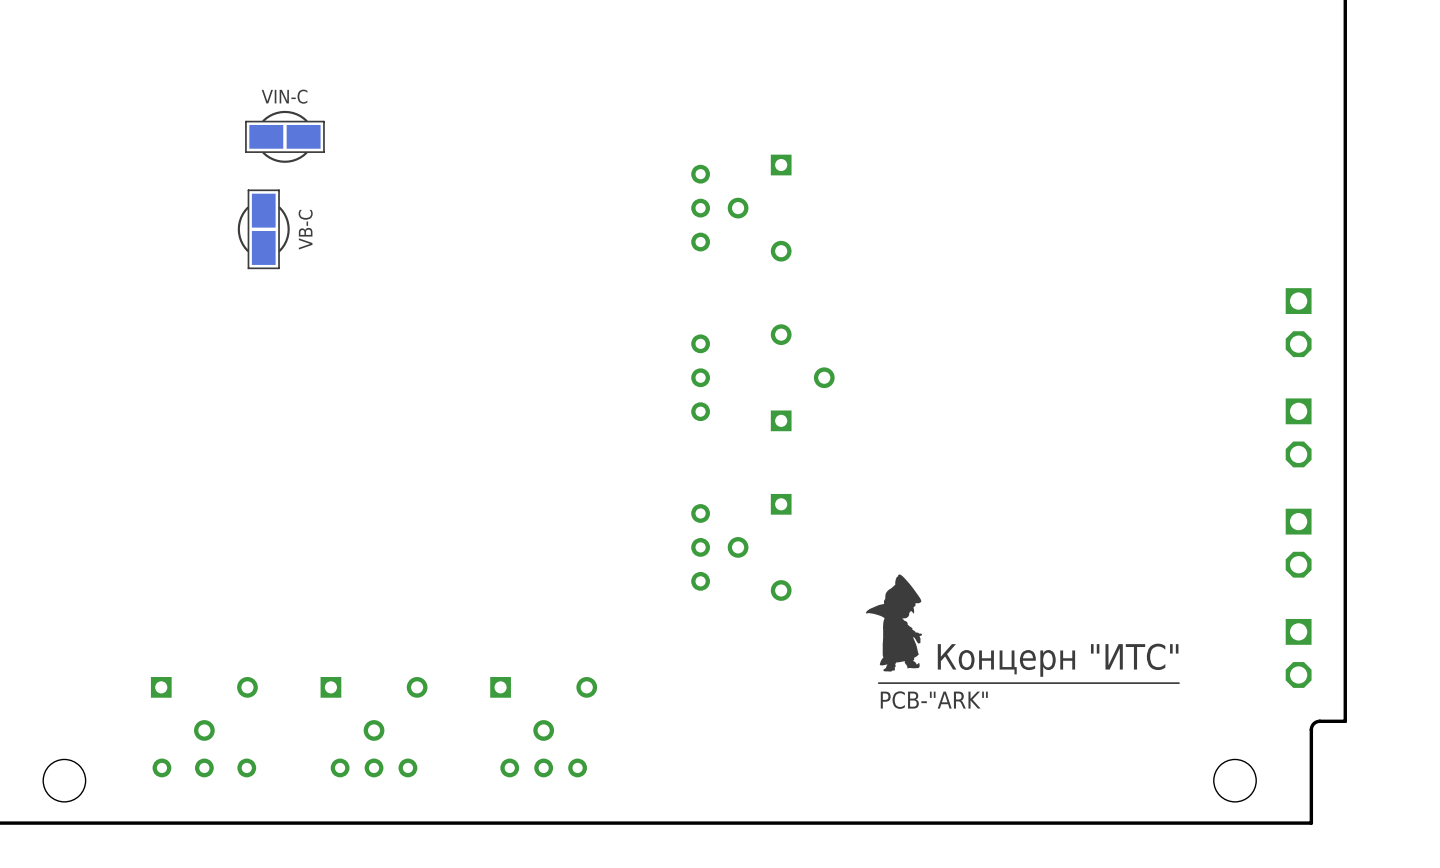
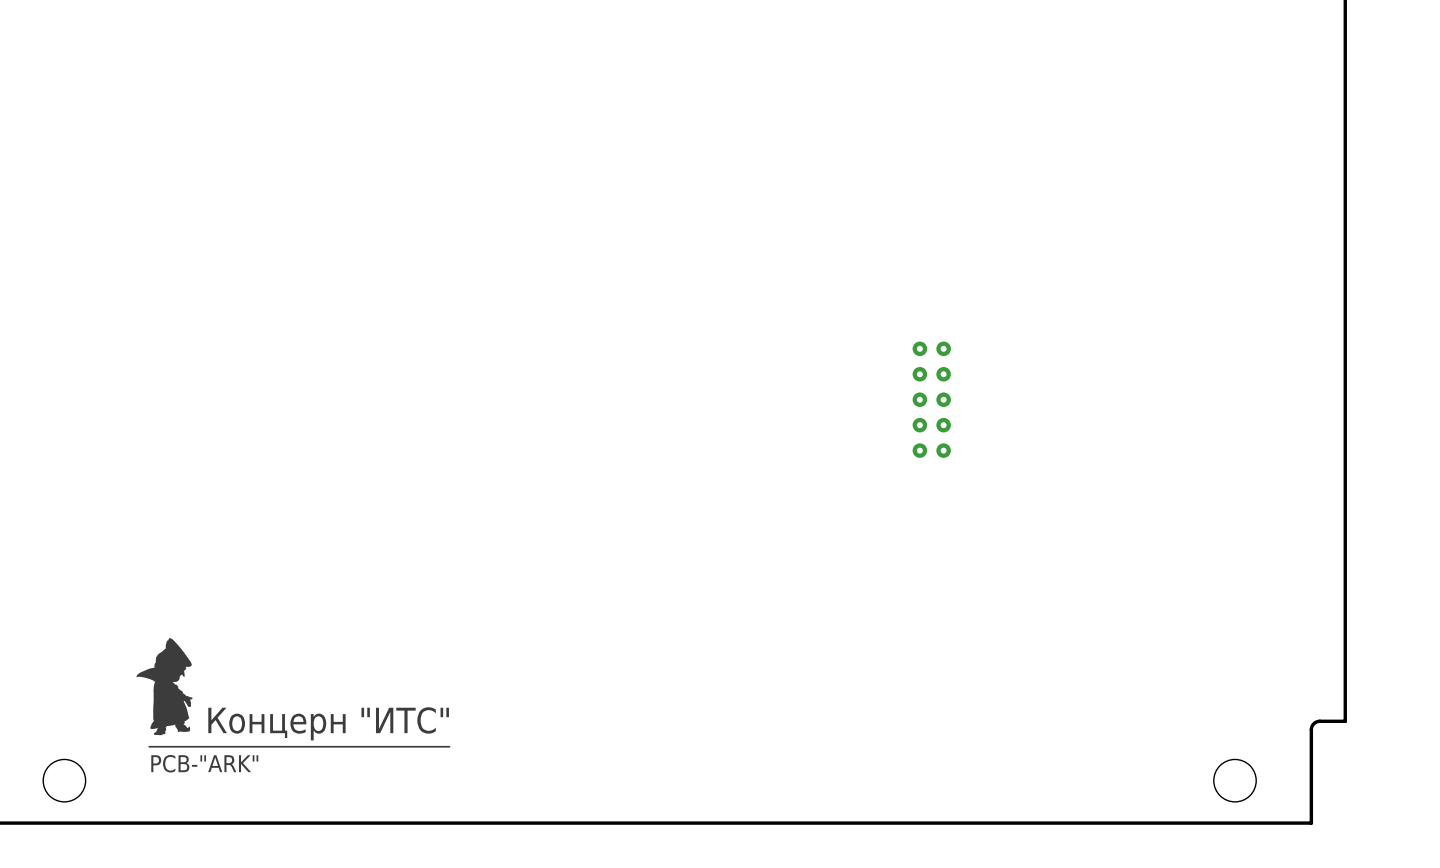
part: VIN-C (284, 136) -> none
part: (700, 174) -> none
part: (700, 208) -> none
part: (759, 208) -> none
part: VB-C (263, 229) -> none
part: (700, 242) -> none
part: (1298, 322) -> none
part: (700, 343) -> none
part: (700, 377) -> none
part: (802, 377) -> none
part: none -> (931, 399)
part: (700, 411) -> none
part: (1298, 432) -> none
part: (700, 513) -> none
part: (1298, 543) -> none
part: (700, 547) -> none
part: (759, 547) -> none
drawing: [866, 574, 1180, 684] -> none
part: (700, 581) -> none
drawing: none -> [136, 638, 451, 748]
part: (1298, 653) -> none
part: (204, 708) -> none
part: (374, 708) -> none
part: (543, 708) -> none
part: (161, 767) -> none
part: (204, 767) -> none
part: (246, 767) -> none
part: (340, 767) -> none
part: (374, 767) -> none
part: (407, 767) -> none
part: (509, 767) -> none
part: (543, 767) -> none
part: (577, 767) -> none

